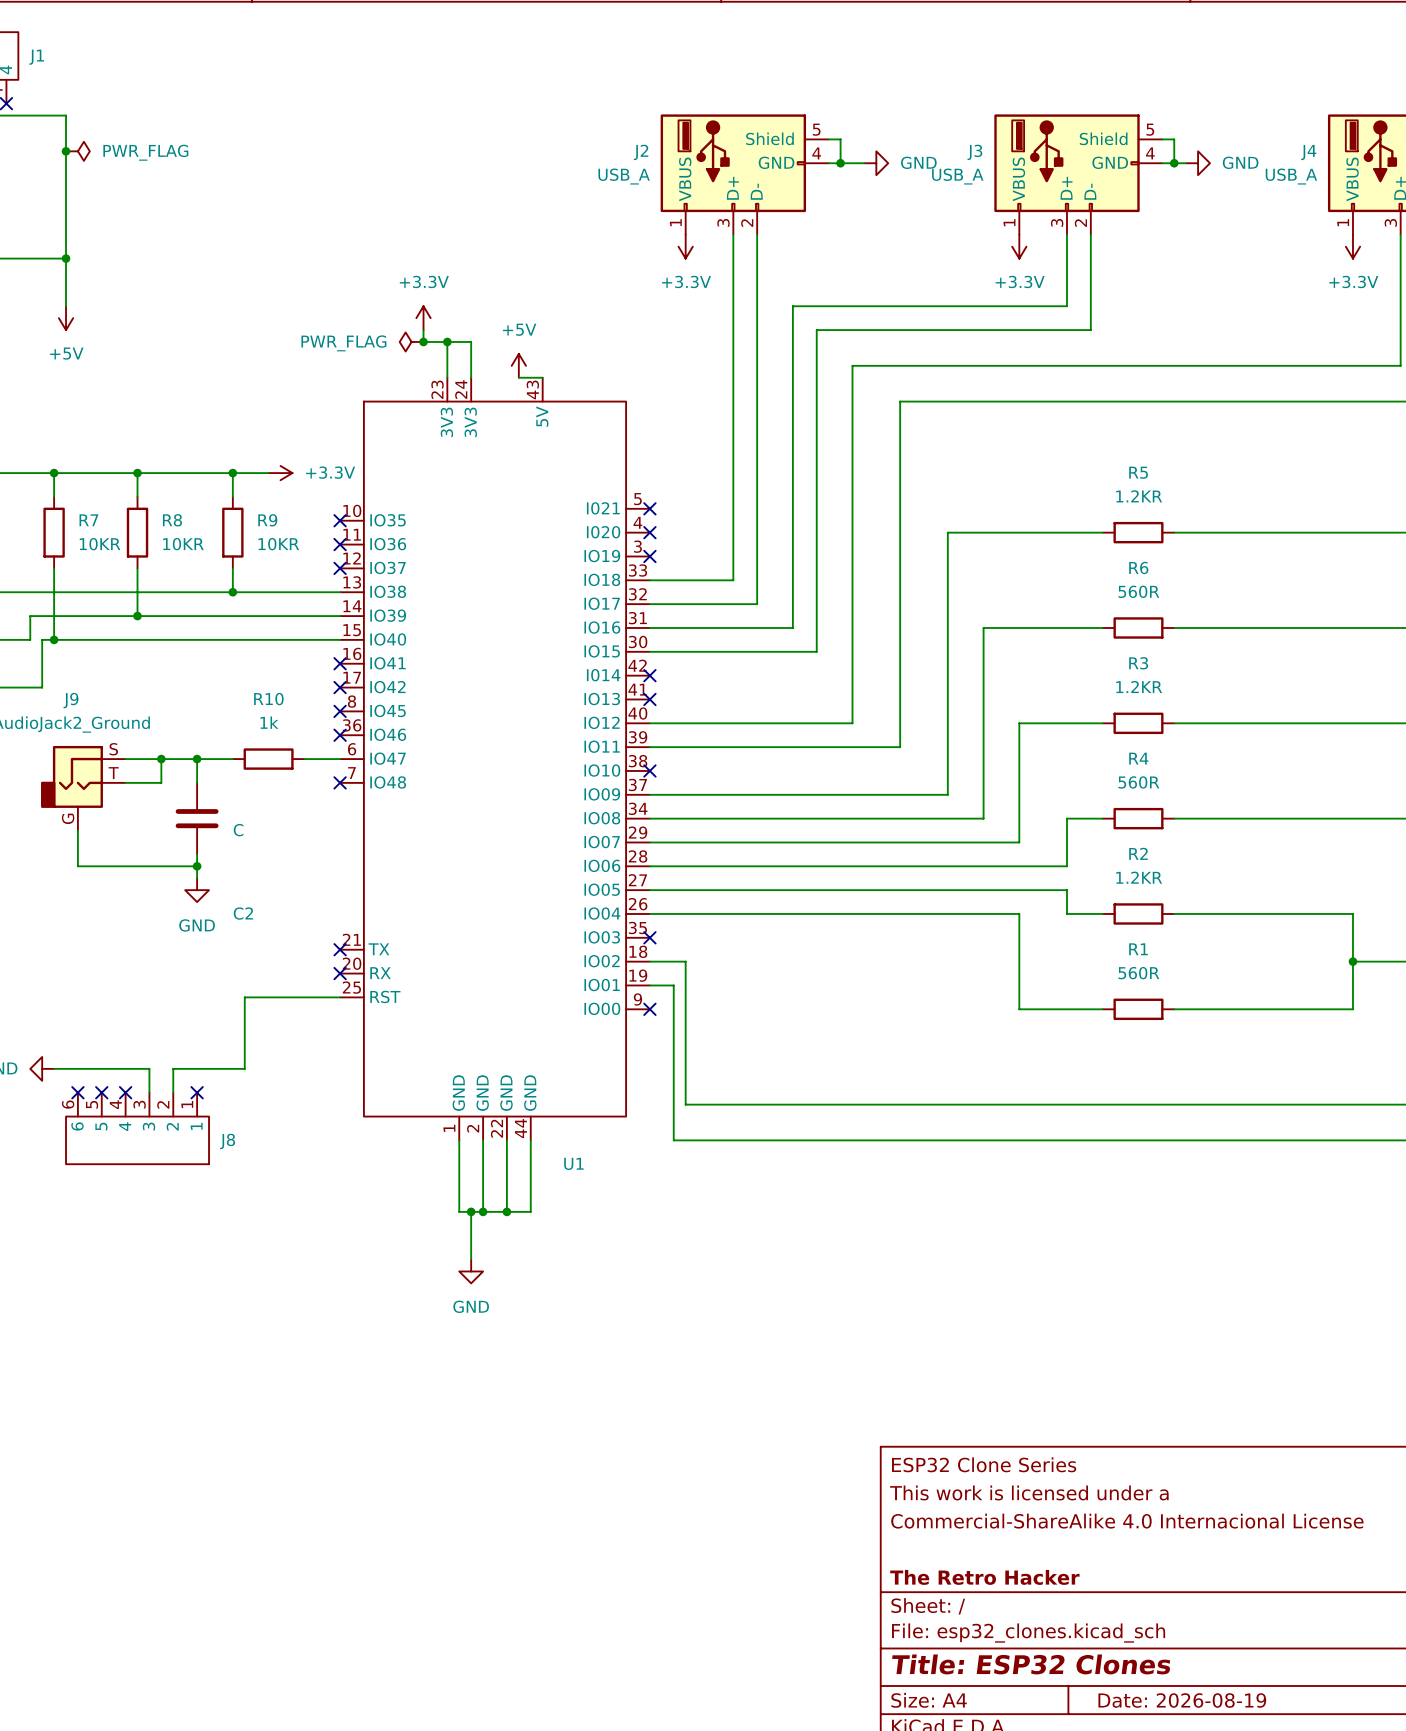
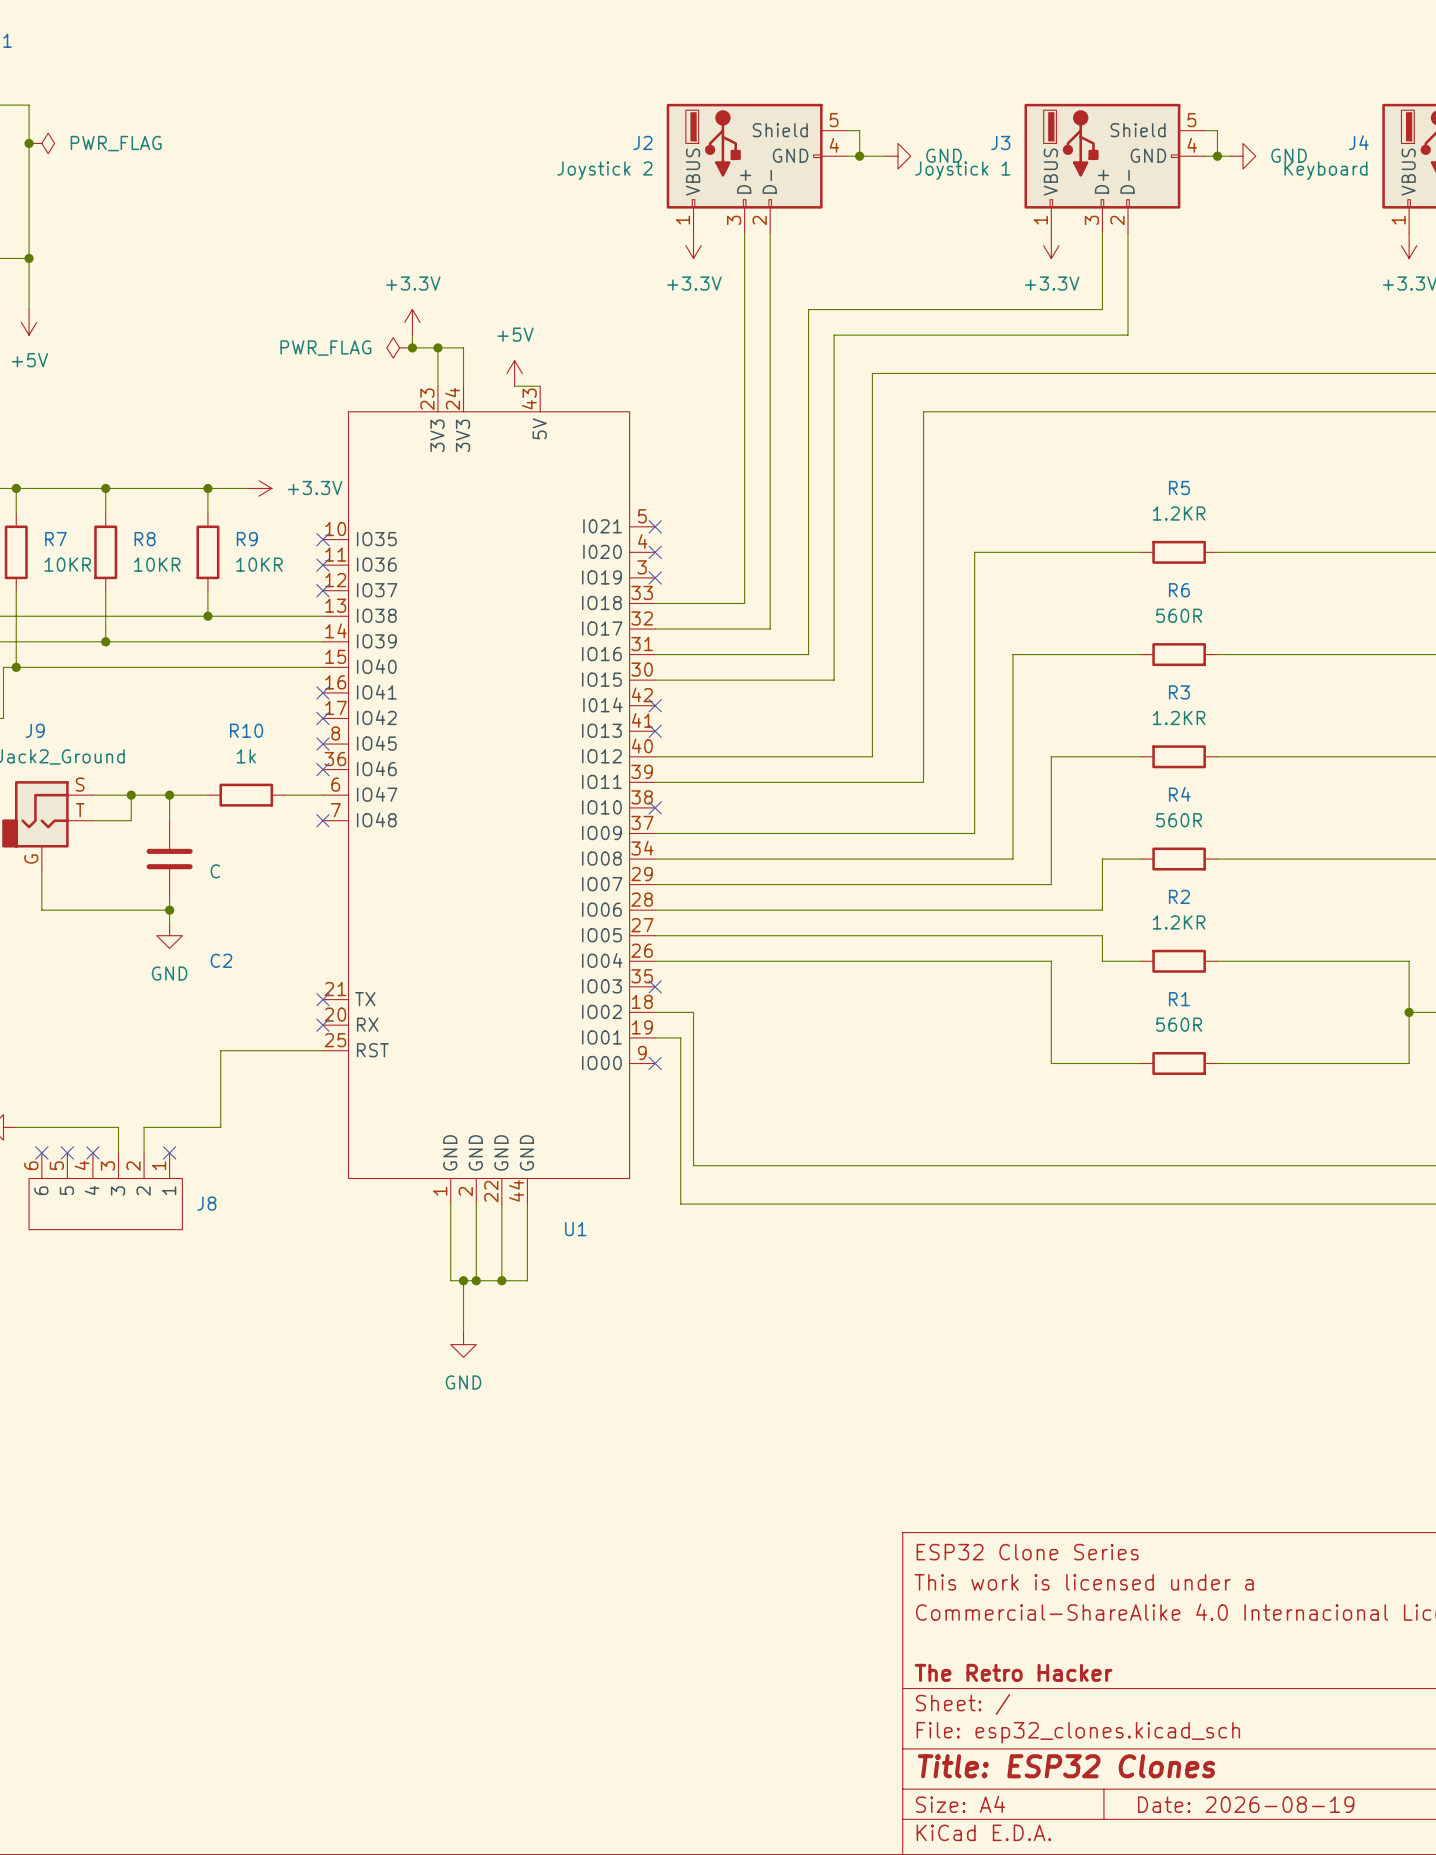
J2 value: USB_A (624, 176) -> Joystick 2 (604, 170)
J3 value: USB_A (957, 176) -> Joystick 1 (962, 170)
J4 value: USB_A (1291, 176) -> Keyboard (1325, 170)

